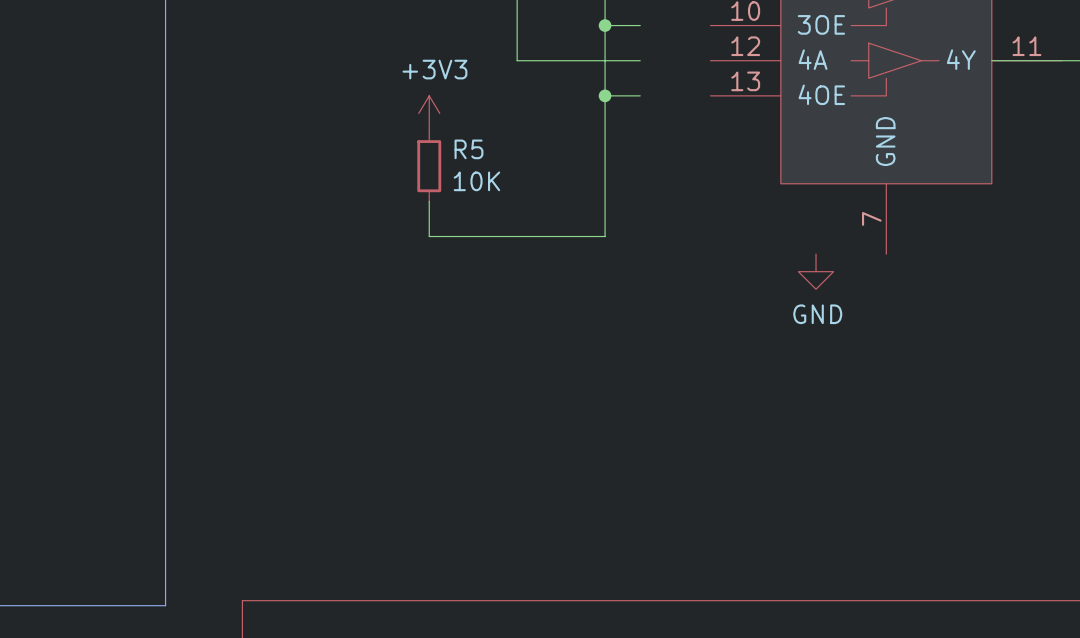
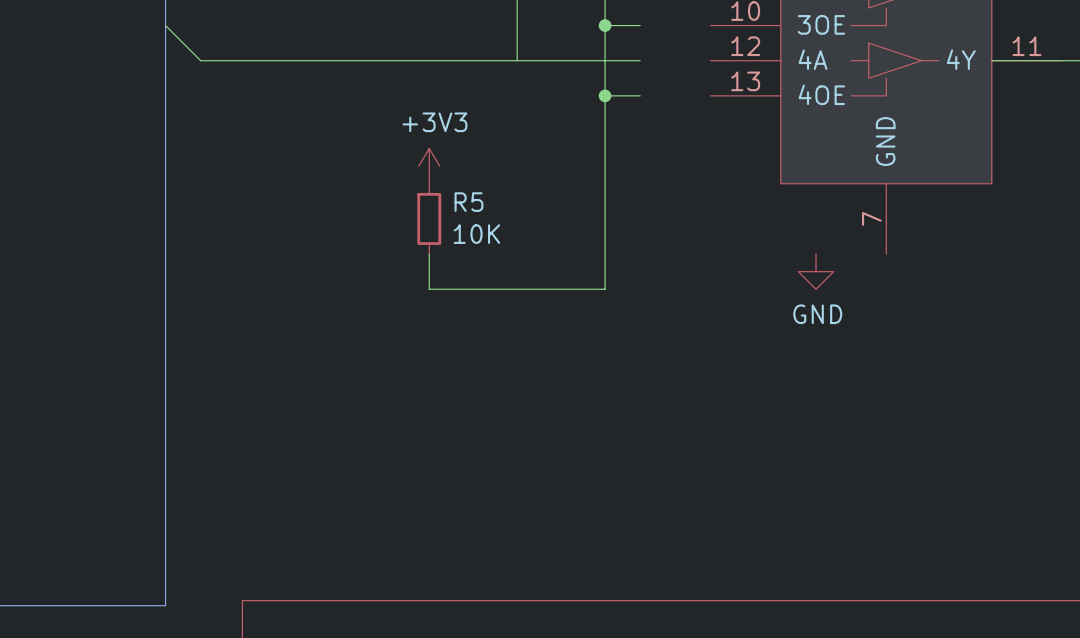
wire: none -> (165, 25) (200, 60) (517, 60)
power symbol position: +3V3 (429, 113) -> +3V3 (429, 166)
R5 position: (429, 166) -> (429, 218)
wire: (429, 201) (429, 236) (605, 236) -> (429, 254) (429, 289) (605, 289) (605, 236)

